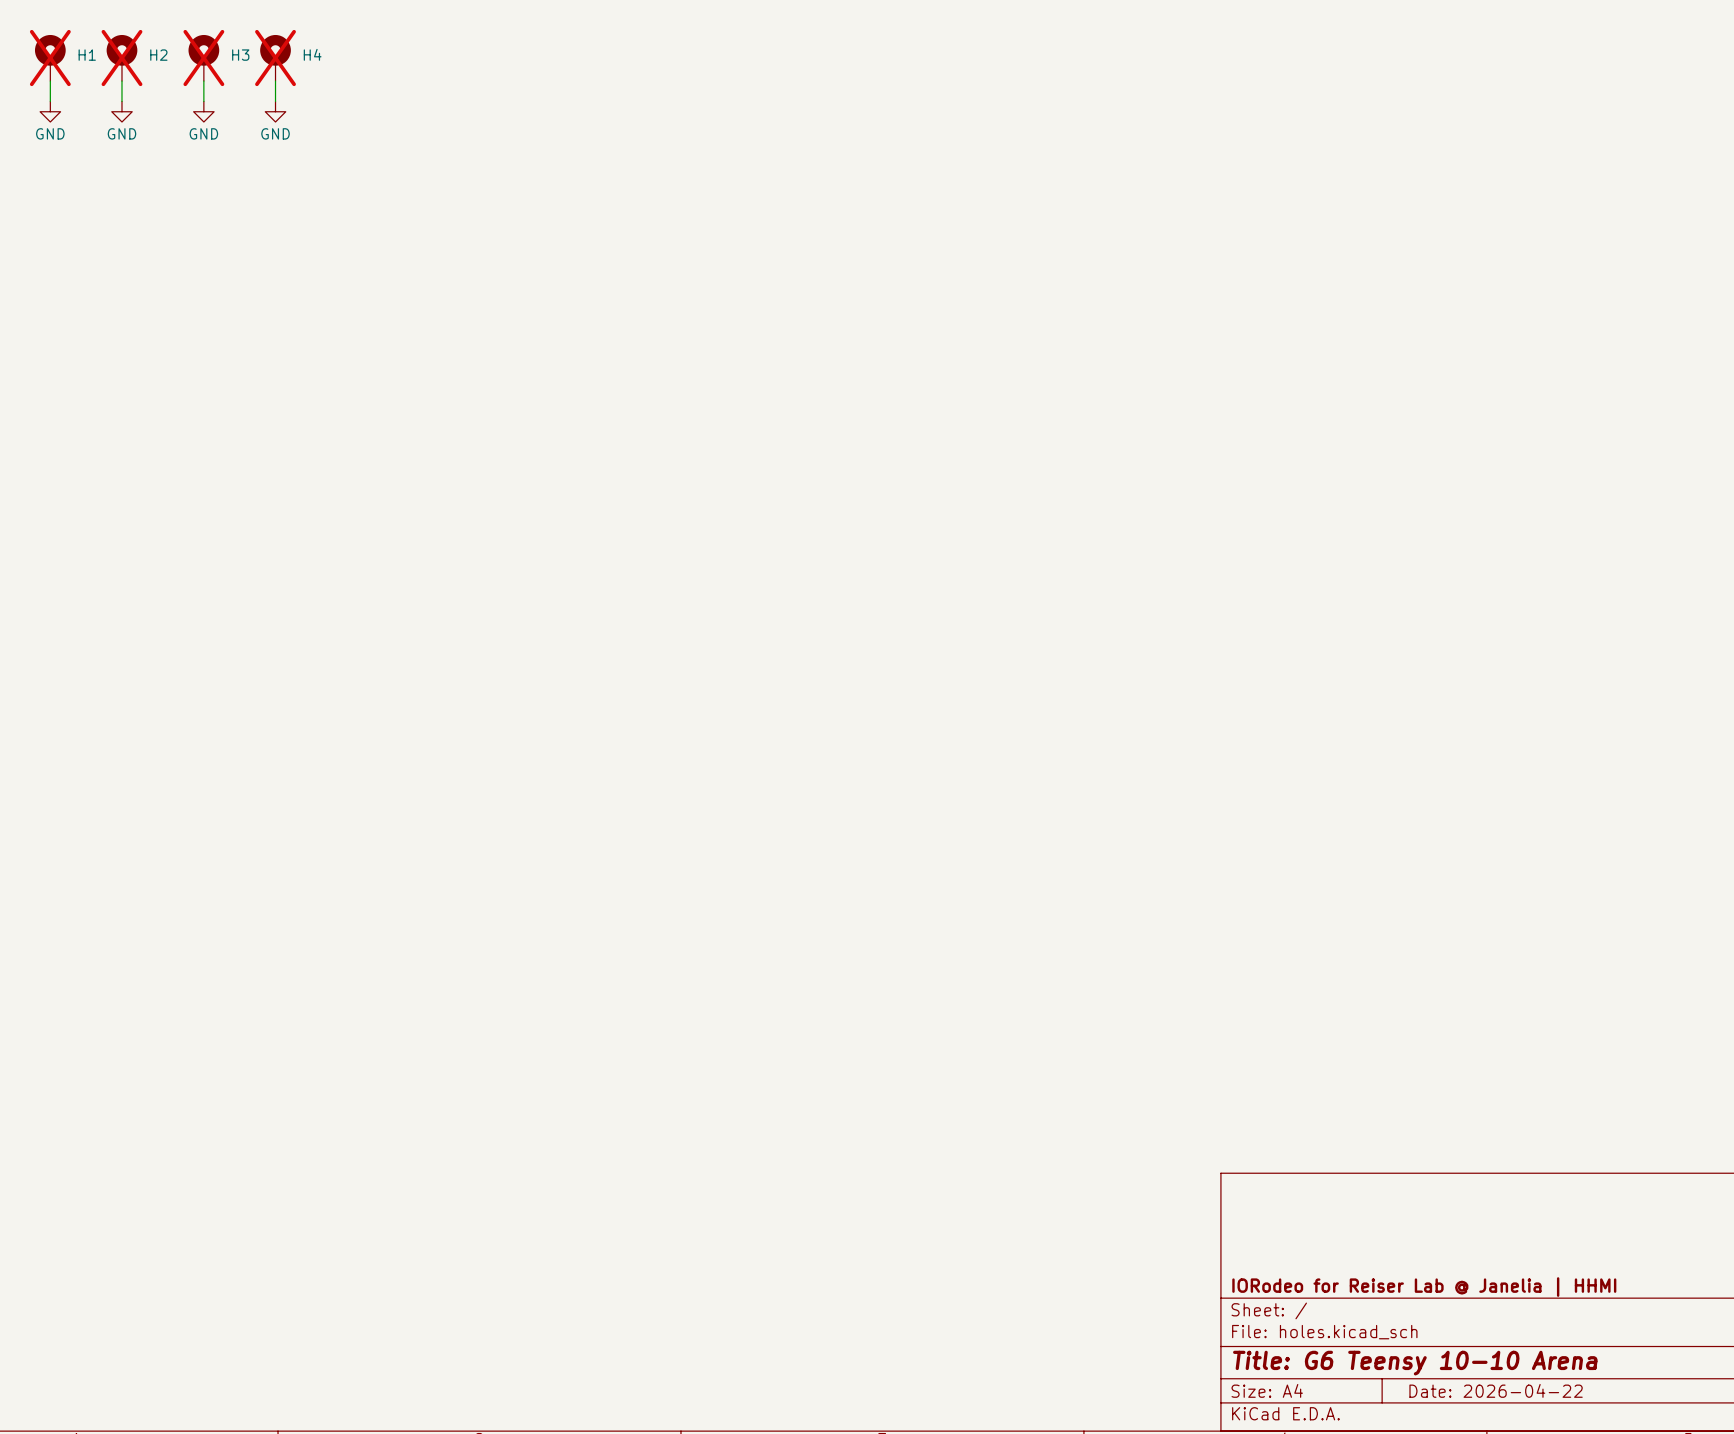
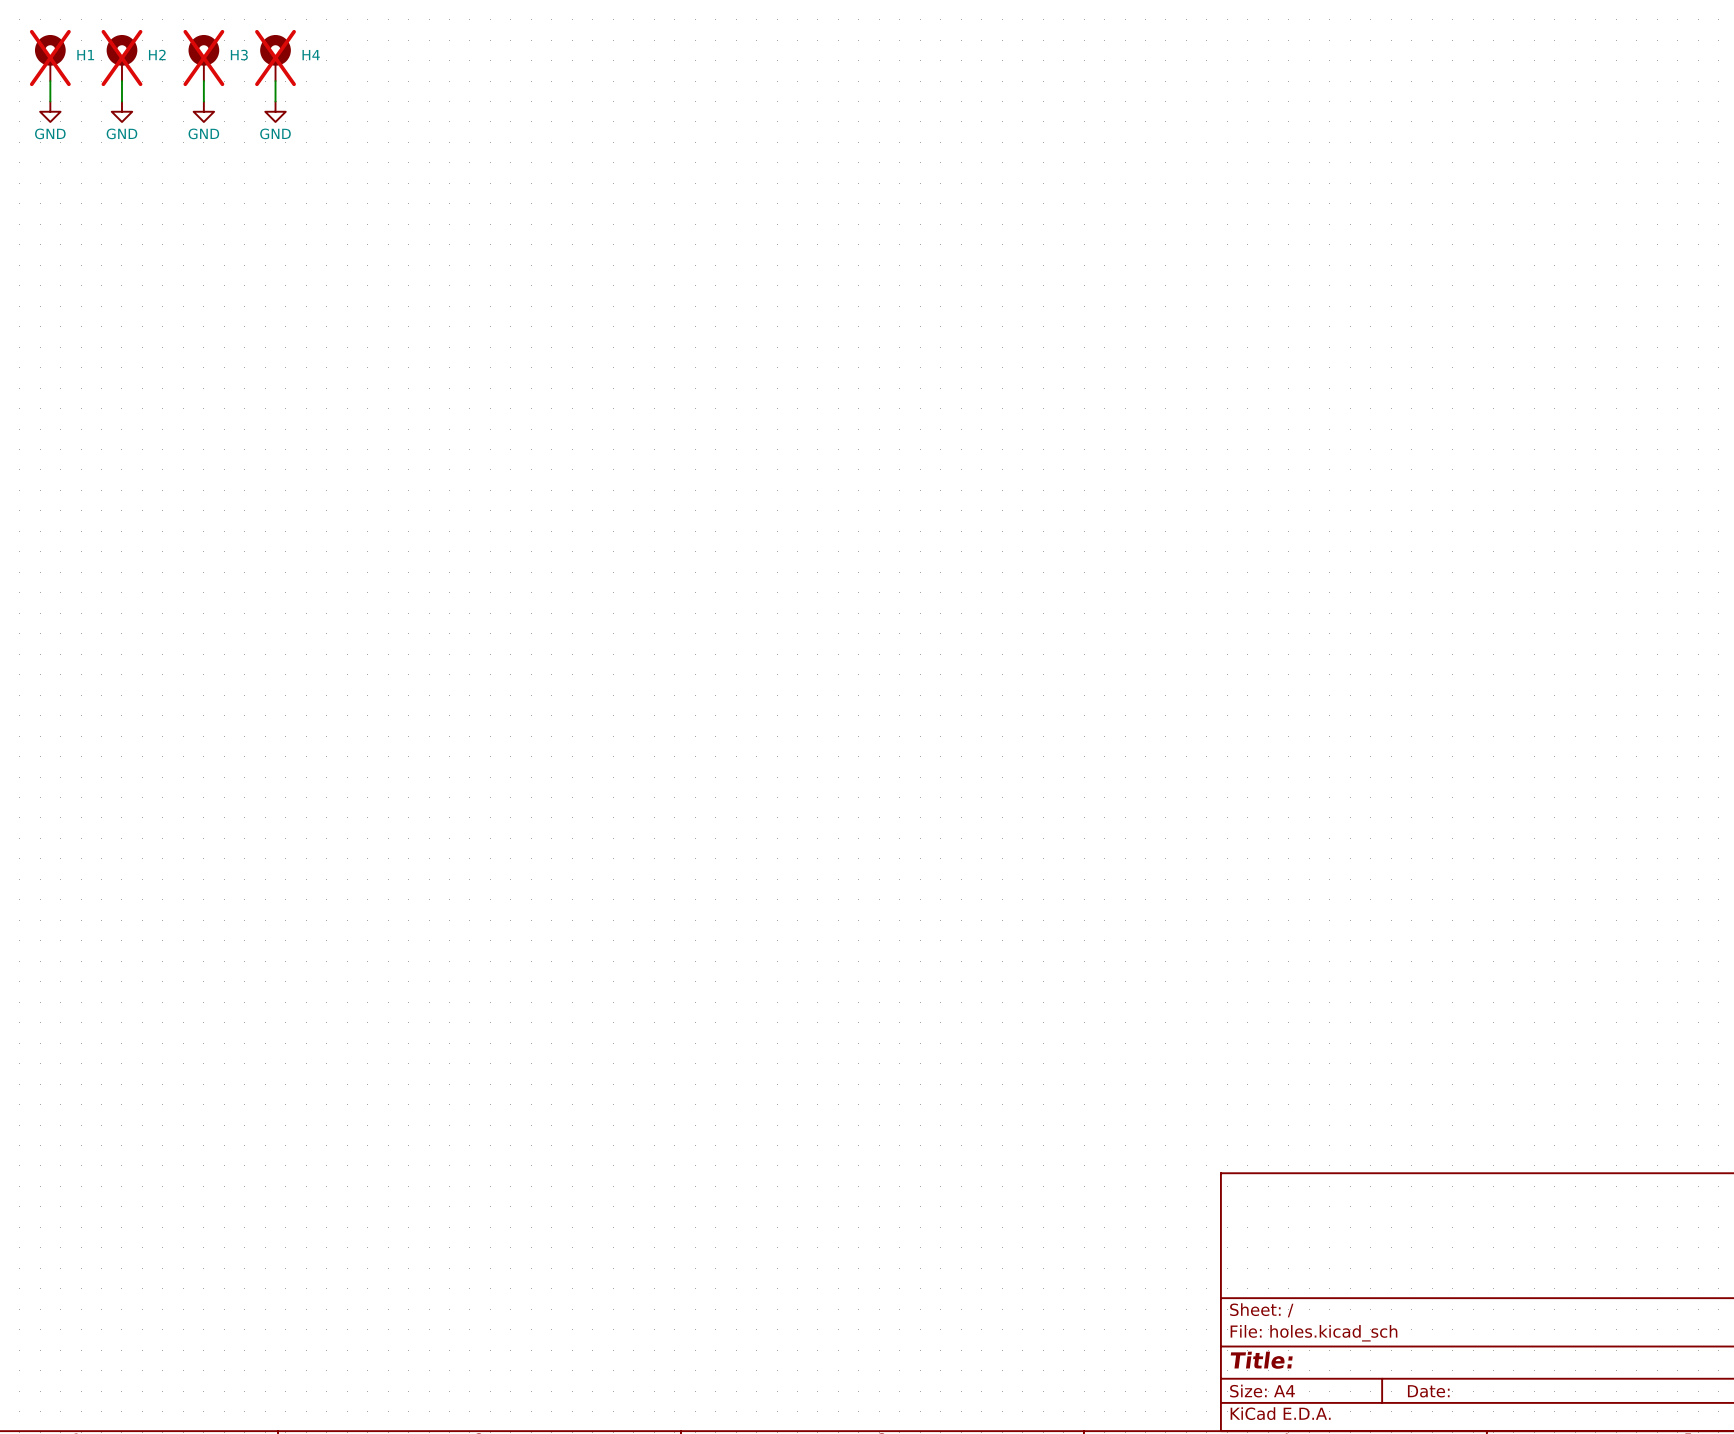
title block: IORodeo for Reiser Lab @ Janelia | HHMI (1424, 1287) -> none
title block: Title: G6 Teensy 10-10 Arena (1415, 1363) -> Title: (1261, 1360)
title block: Date: 2026-04-22 (1496, 1390) -> Date: (1428, 1391)

